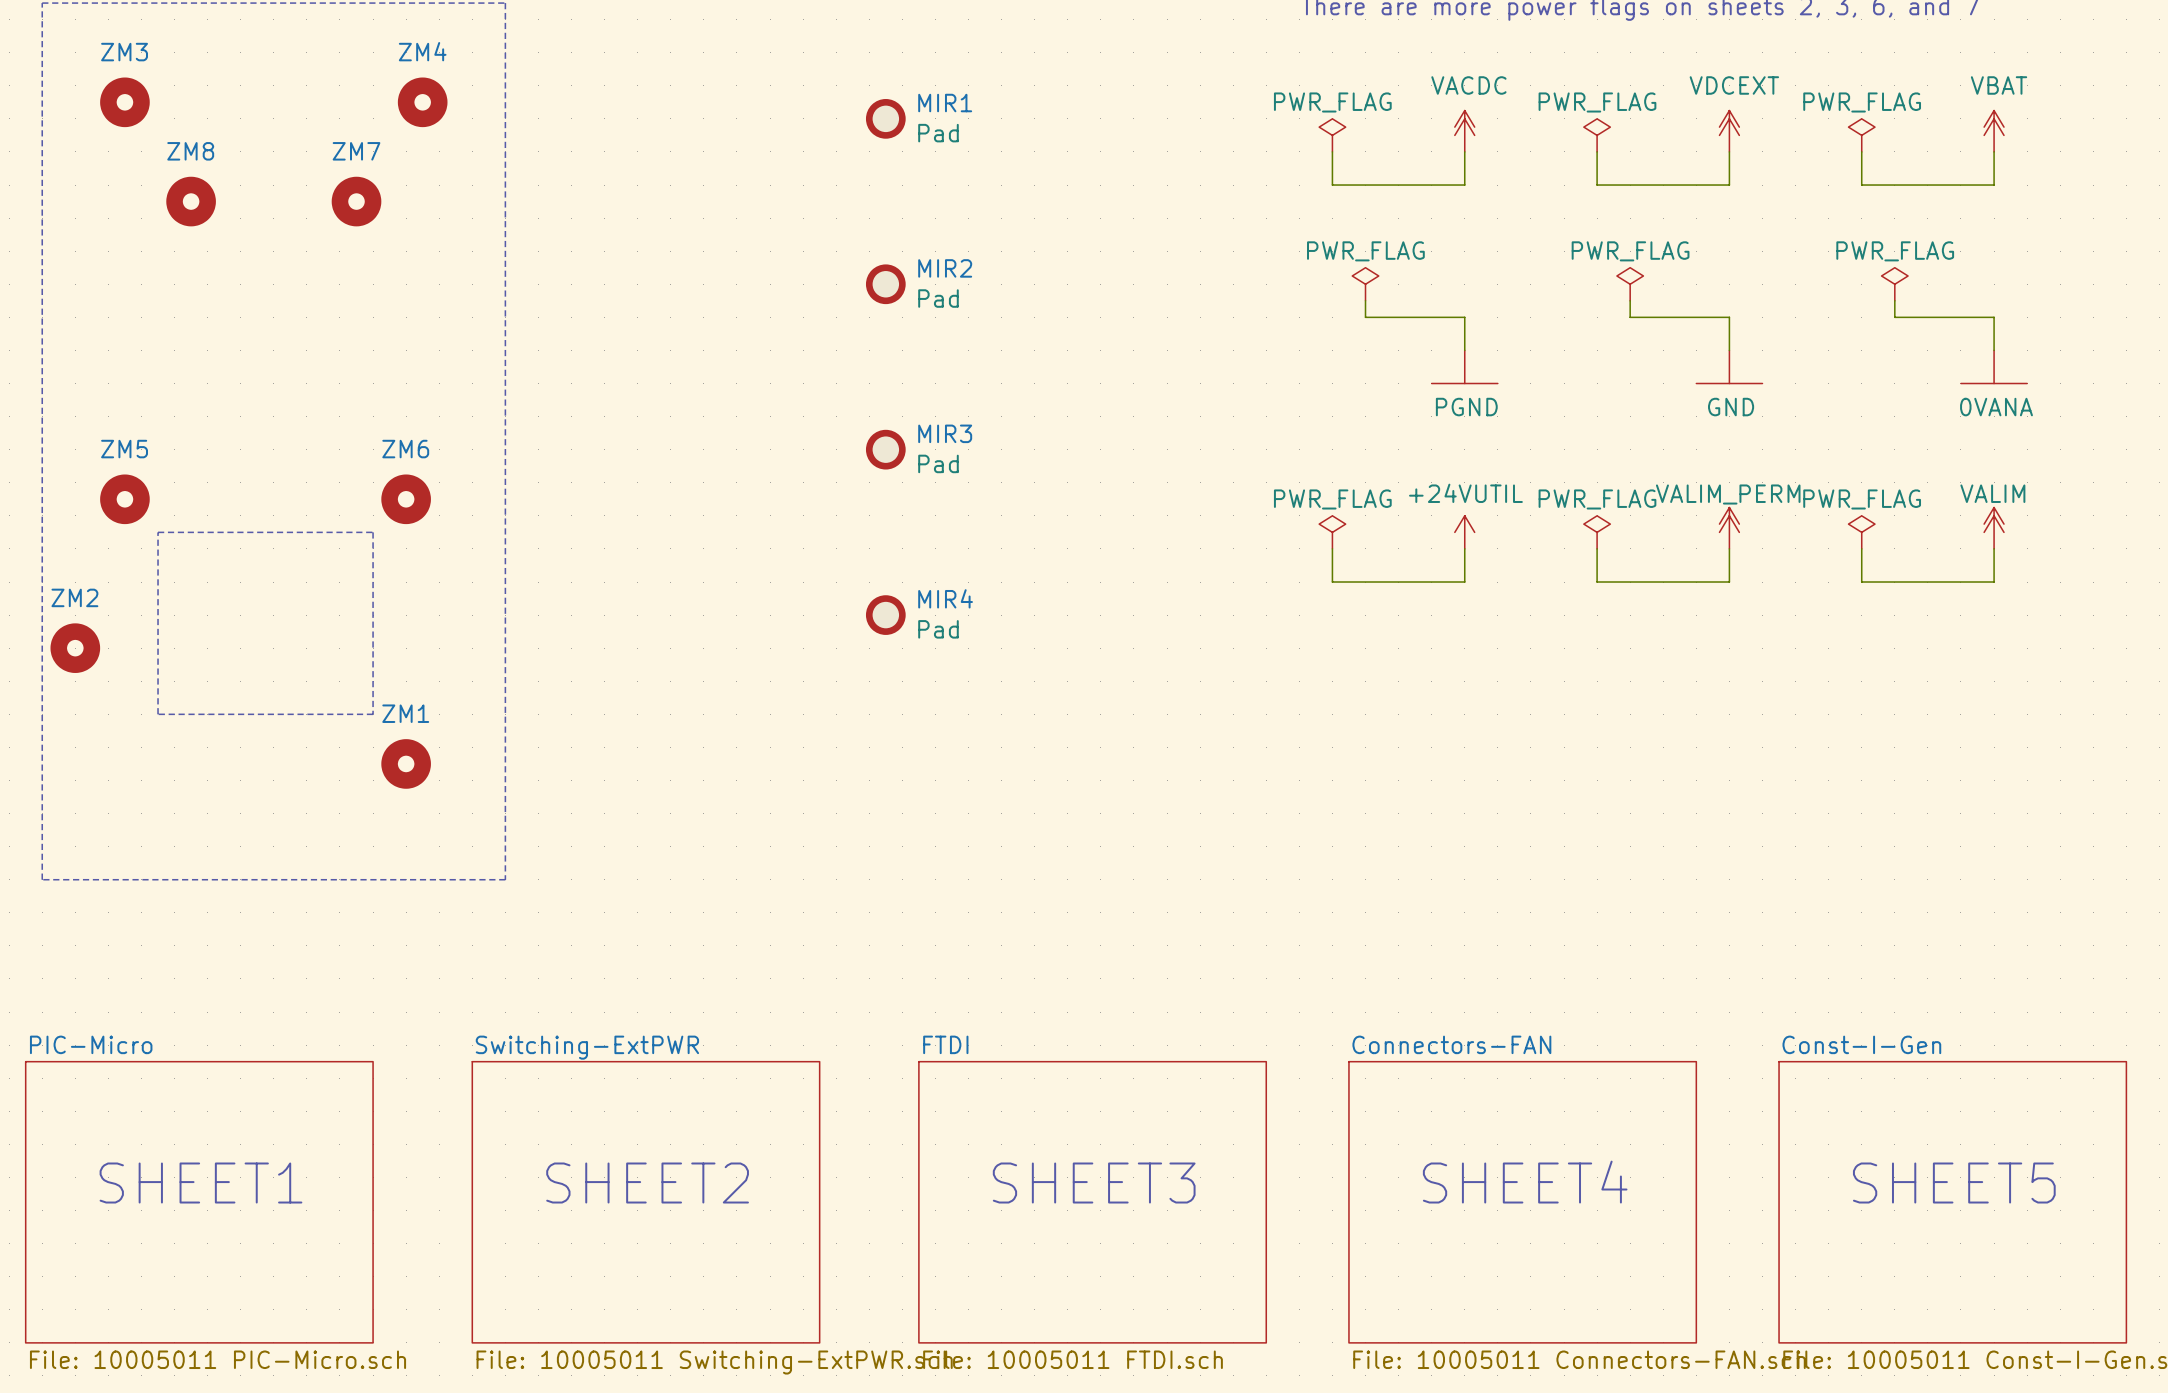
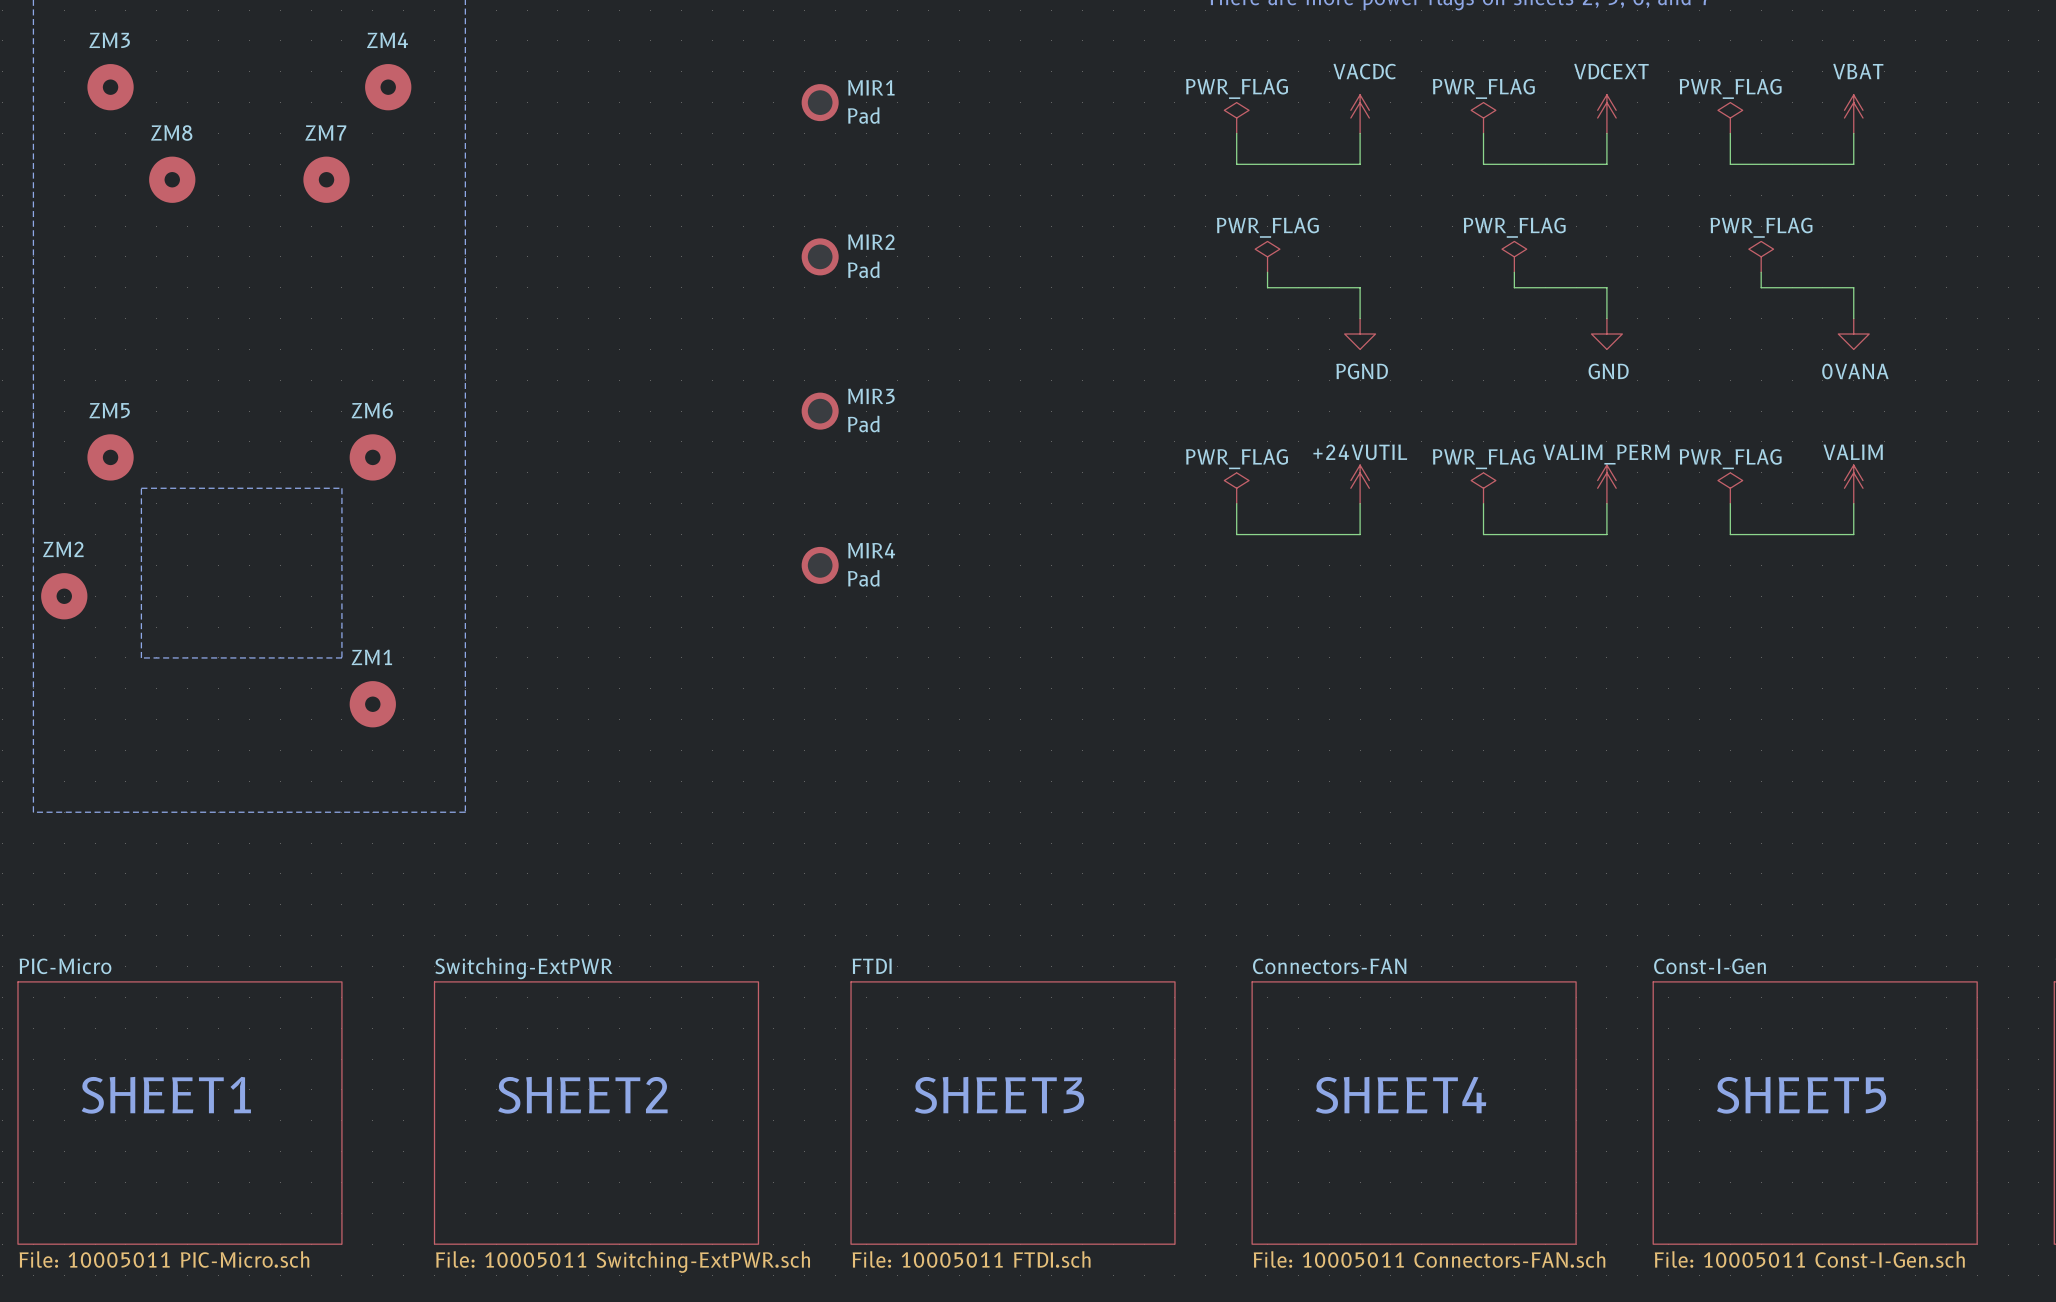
power symbol shape: [1431, 350, 1498, 384] -> [1344, 318, 1376, 350]
power symbol shape: [1696, 350, 1763, 384] -> [1591, 318, 1623, 350]
power symbol shape: [1960, 350, 2028, 384] -> [1838, 318, 1870, 350]
power symbol shape: [1454, 515, 1475, 549] -> [1350, 465, 1370, 504]

